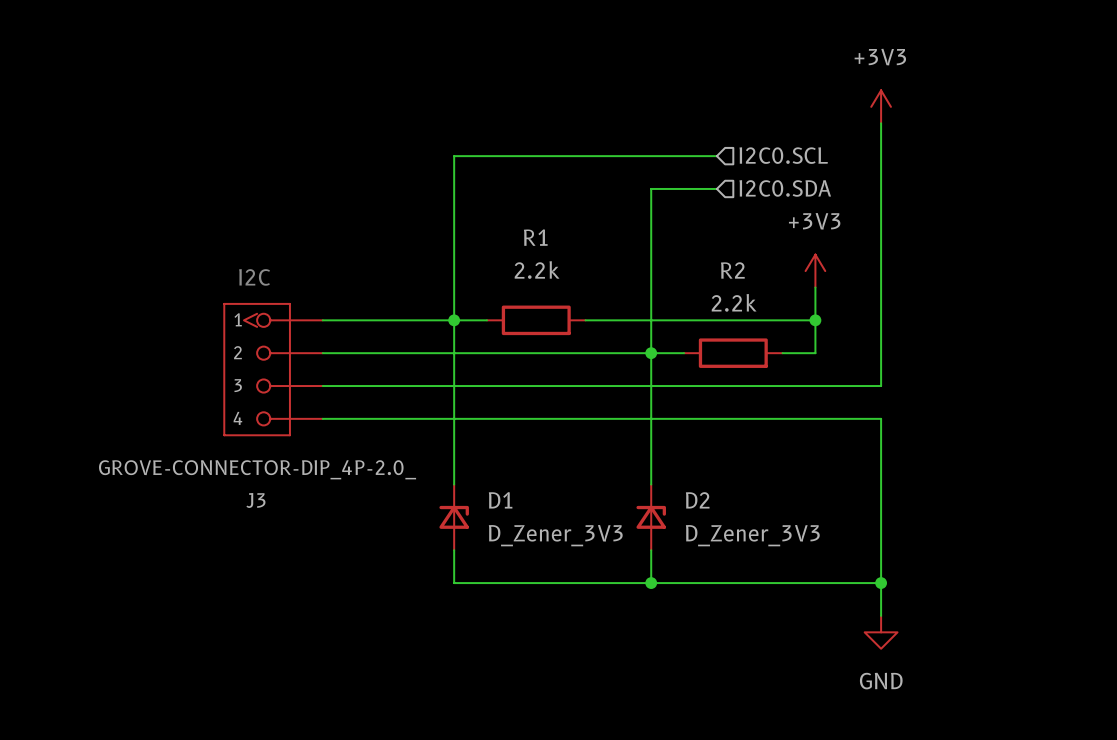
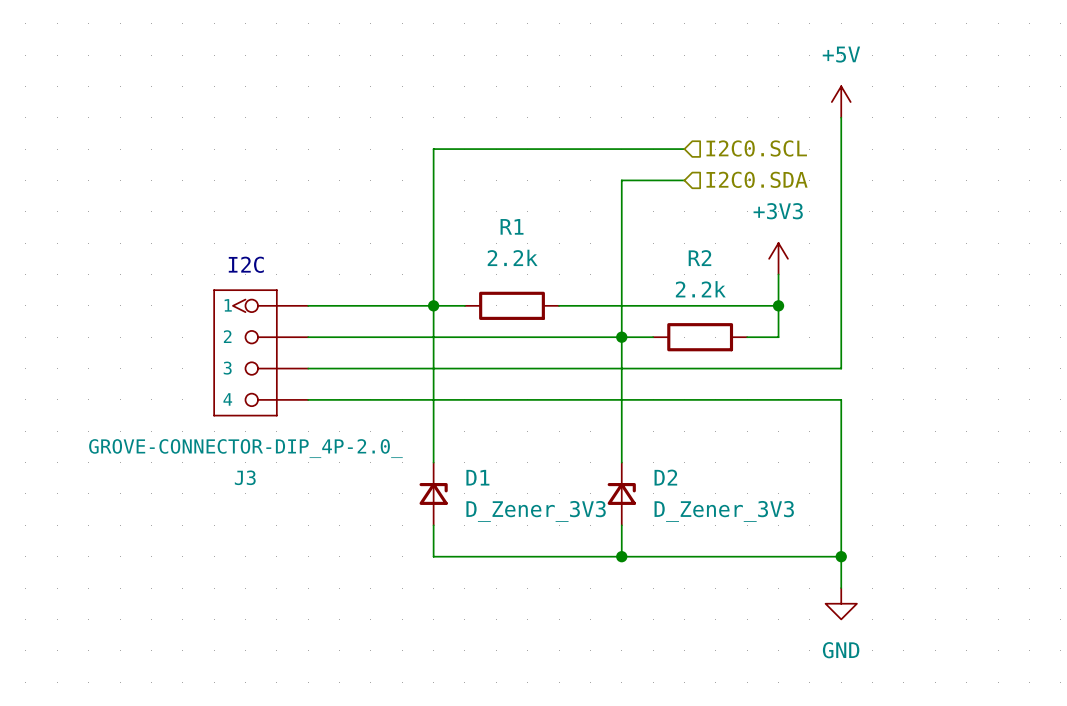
power symbol: +3V3 (881, 106) -> +5V (841, 102)

